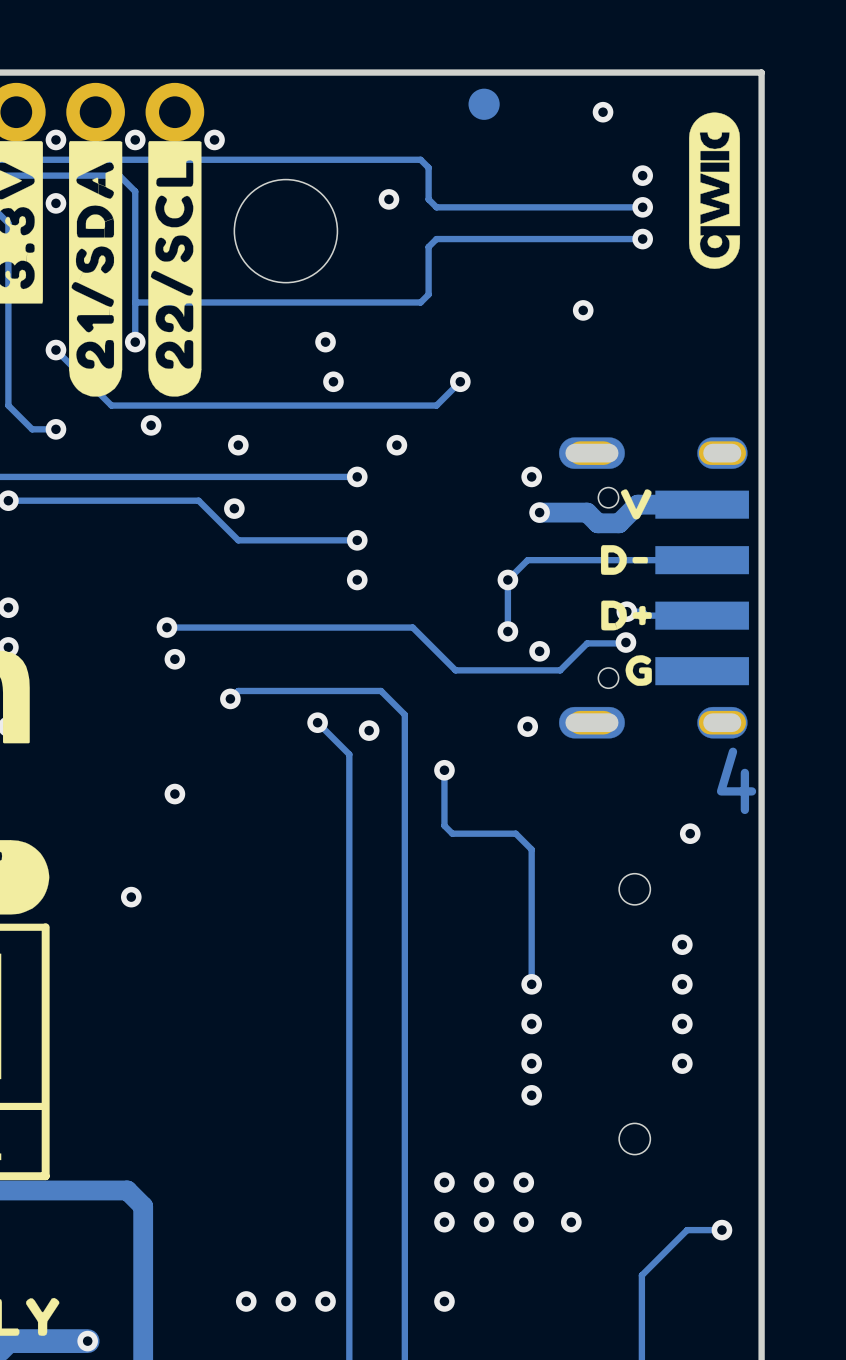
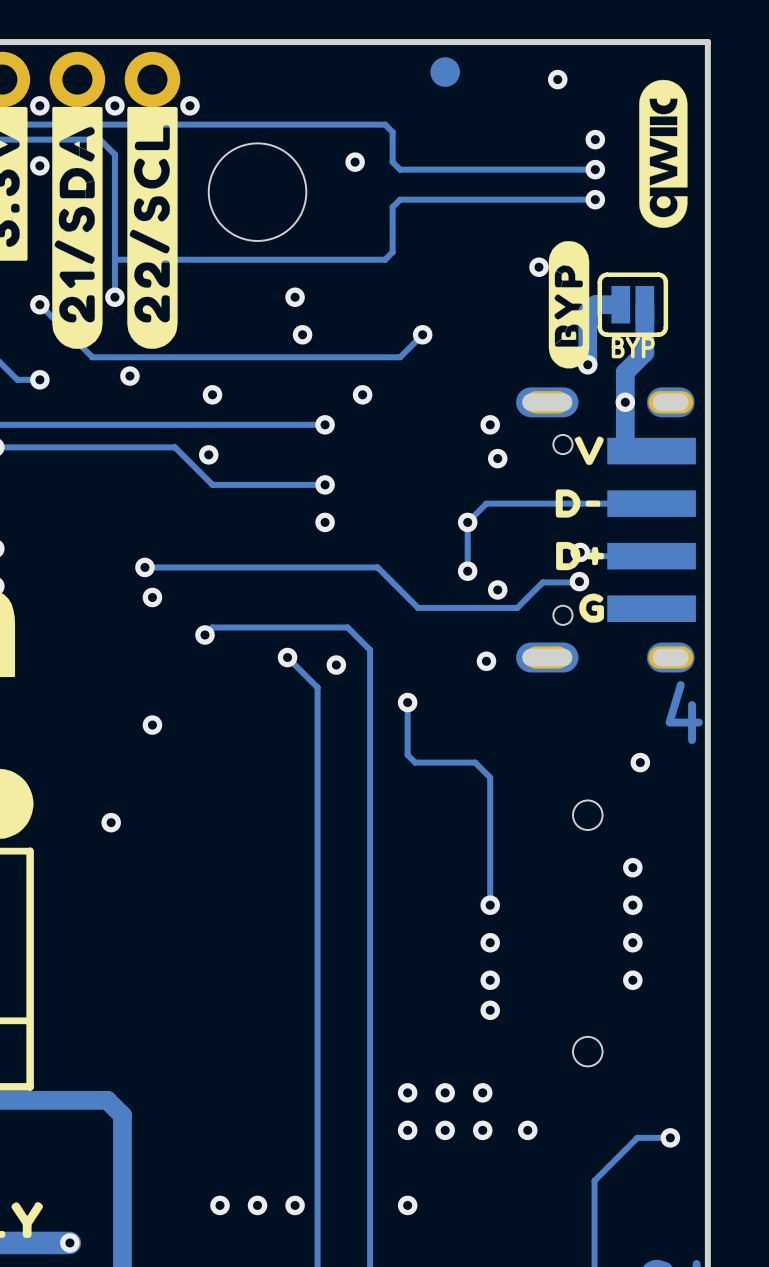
drawing: none -> [548, 241, 590, 369]
track: none -> (620, 304) (595, 304) (587, 312) (587, 364)
BYP: none -> (632, 304)
via: none -> (587, 364)
via: none -> (625, 402)
track: (678, 504) (637, 504) (619, 523) (597, 523) (587, 512) (539, 512) -> (629, 451) (625, 447) (625, 372) (644, 352) (644, 304)

